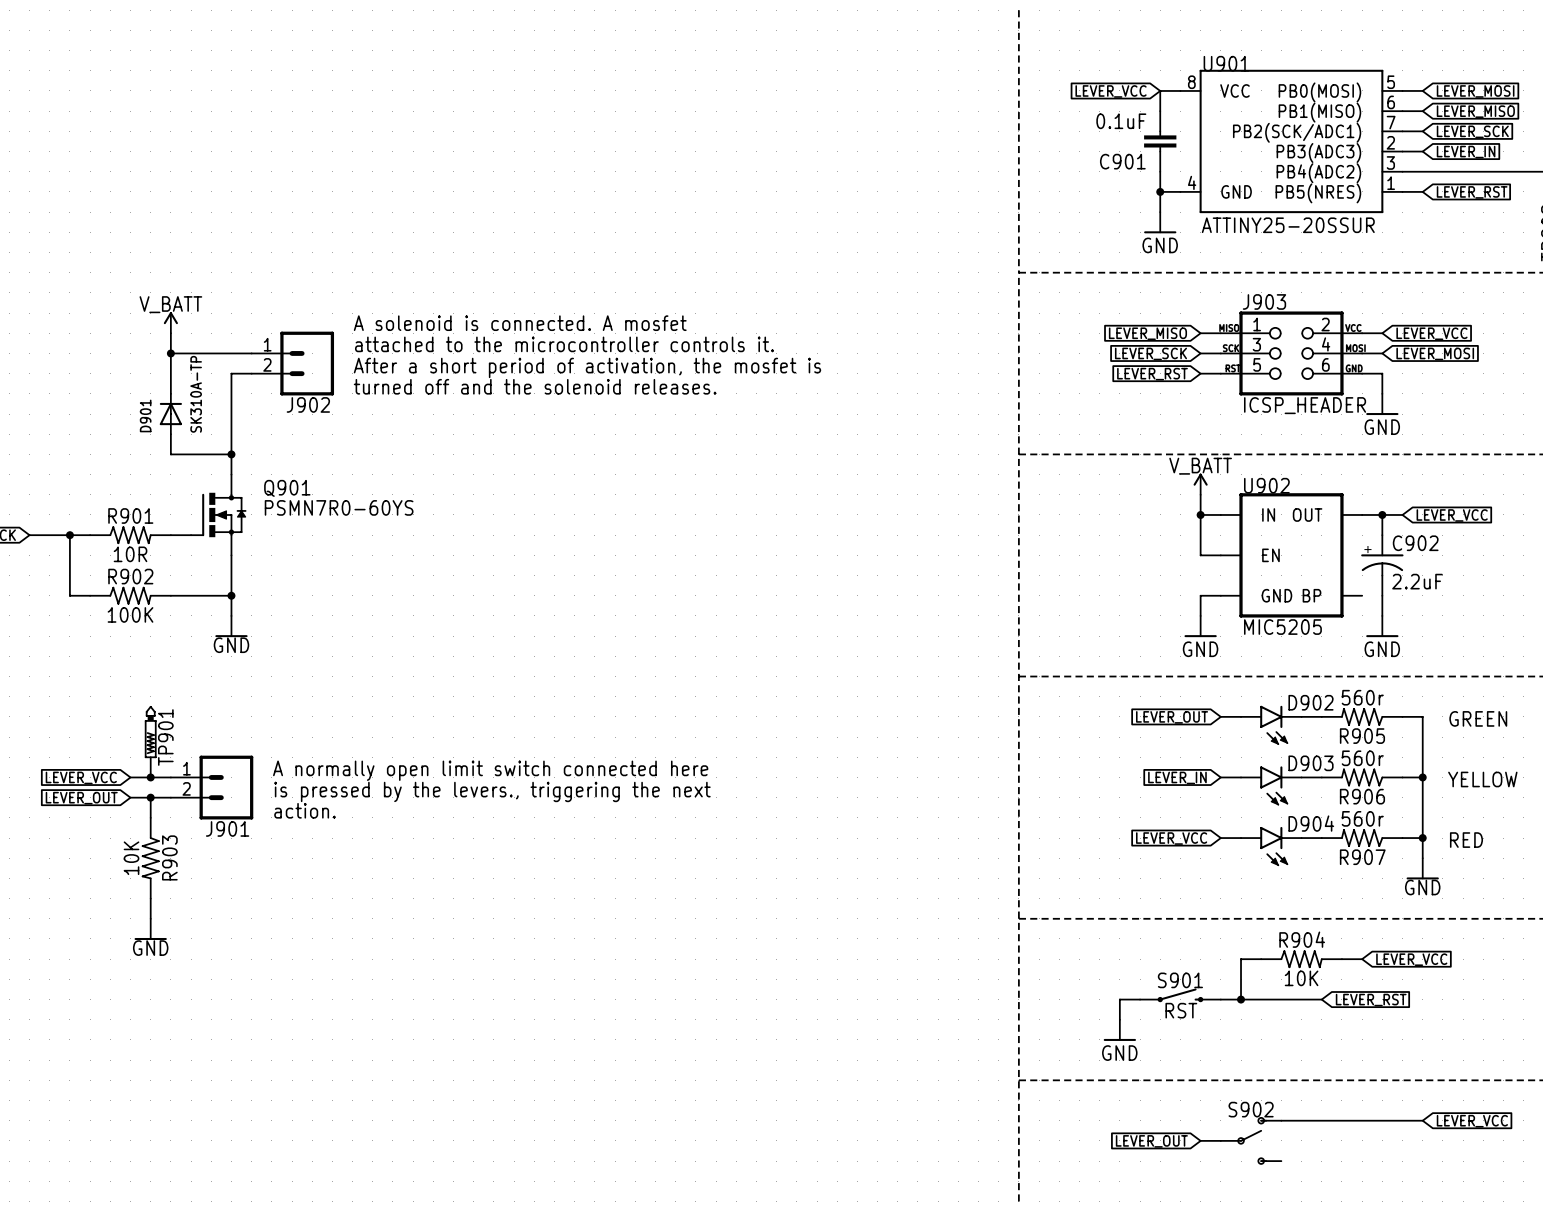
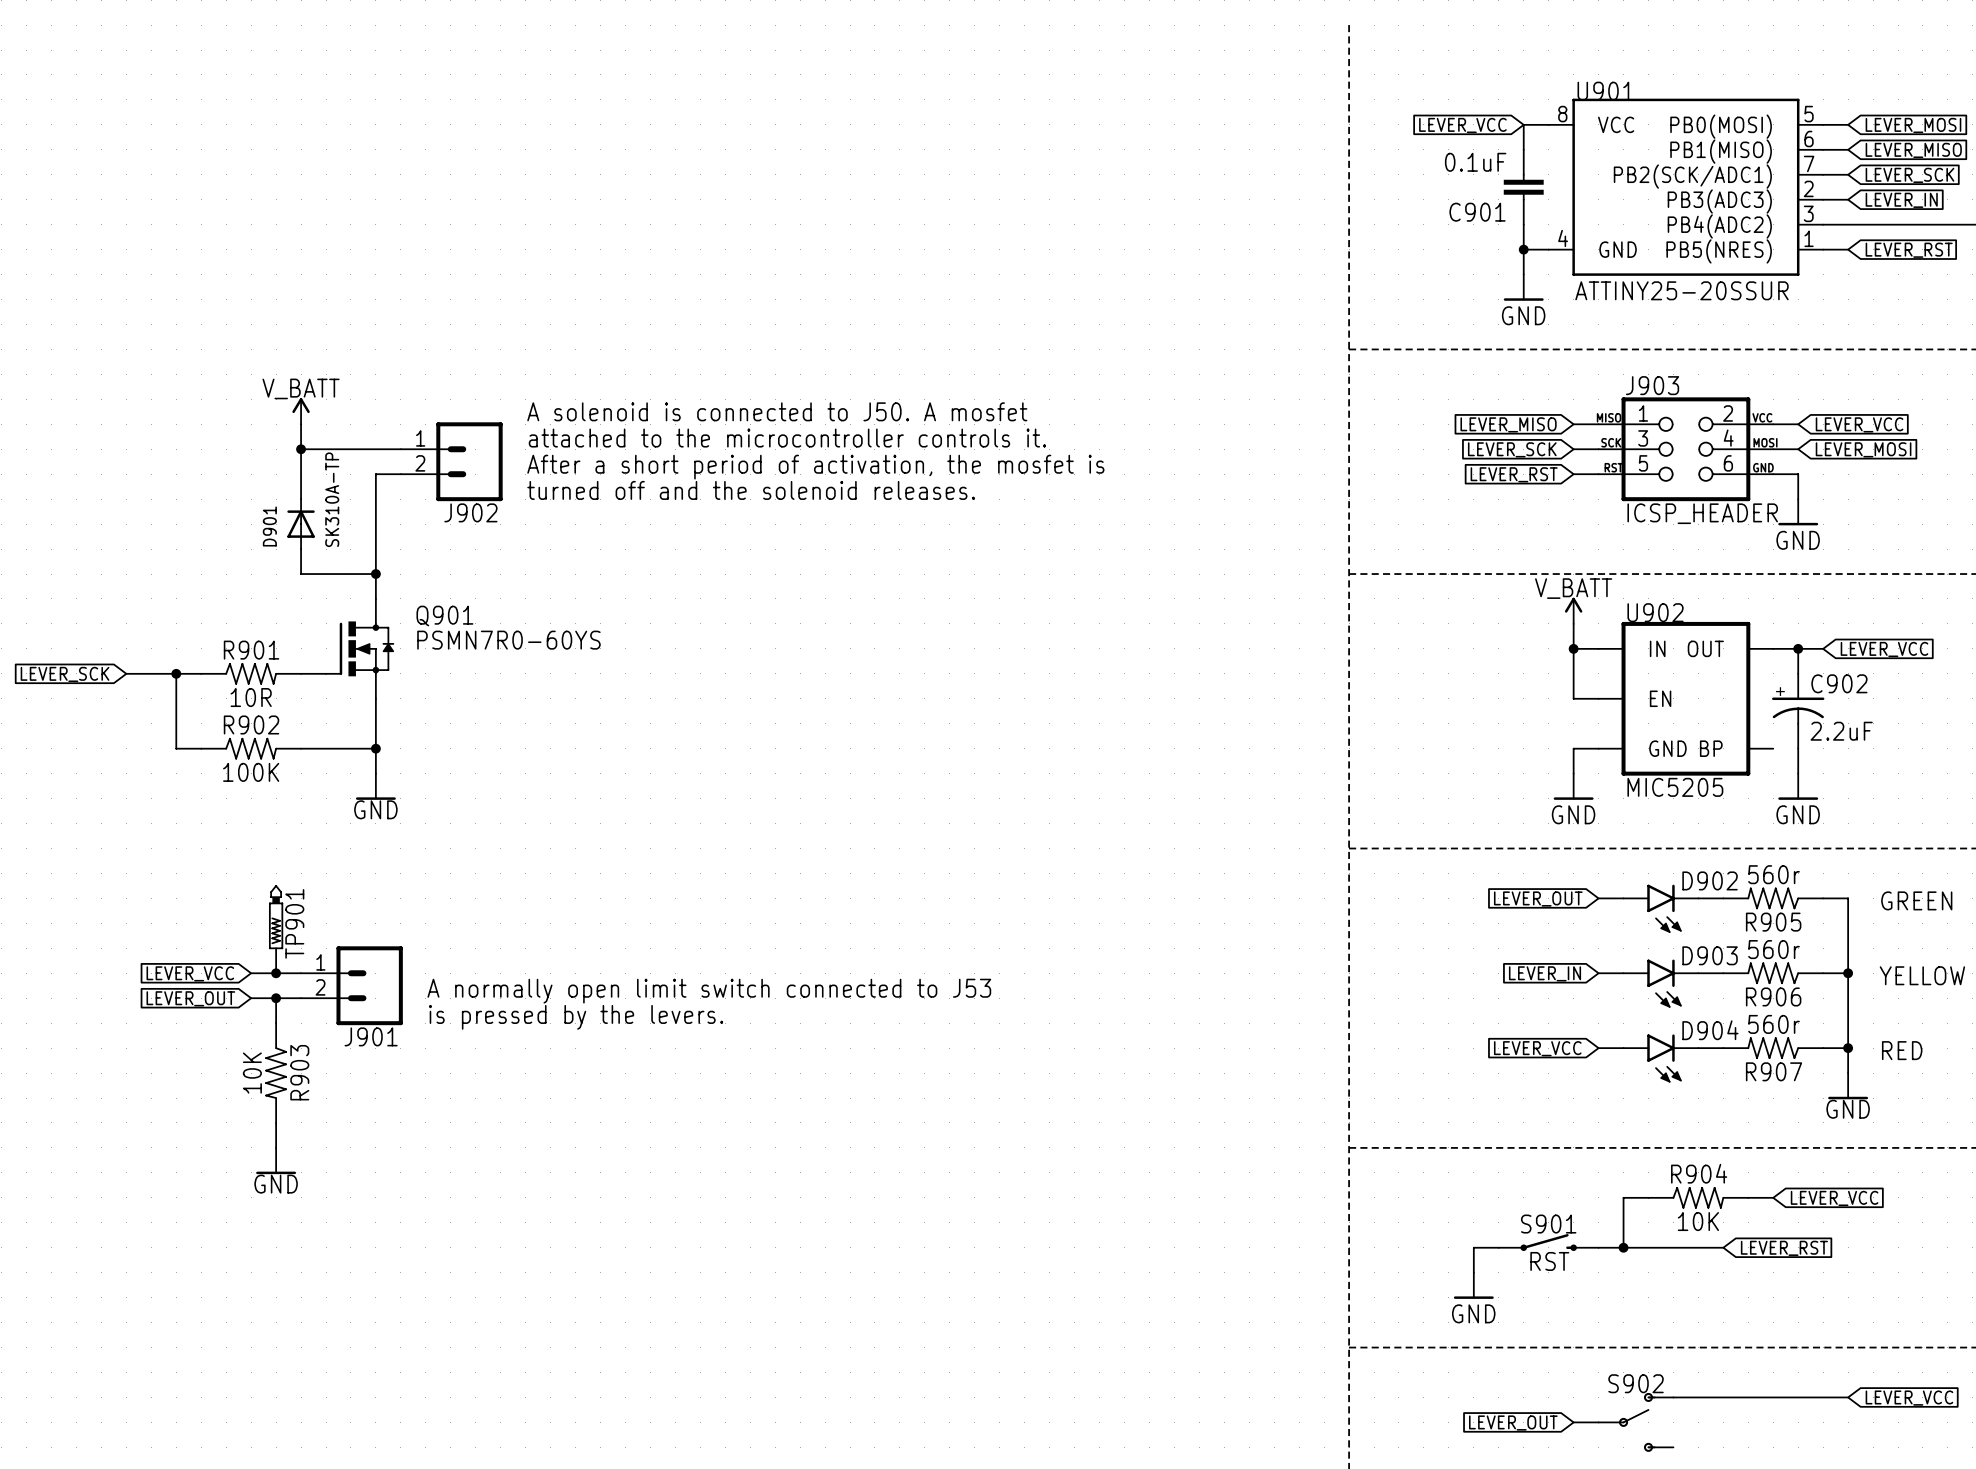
text: A solenoid is connected. A mosfet (520, 323) -> A solenoid is connected to J50. A mosfet (777, 411)
text: A normally open limit switch connected here (490, 770) -> none
text: is pressed by the levers., triggering the next (492, 791) -> A normally open limit switch connected to J53 (709, 991)
text: action. (304, 810) -> is pressed by the levers. (576, 1017)

